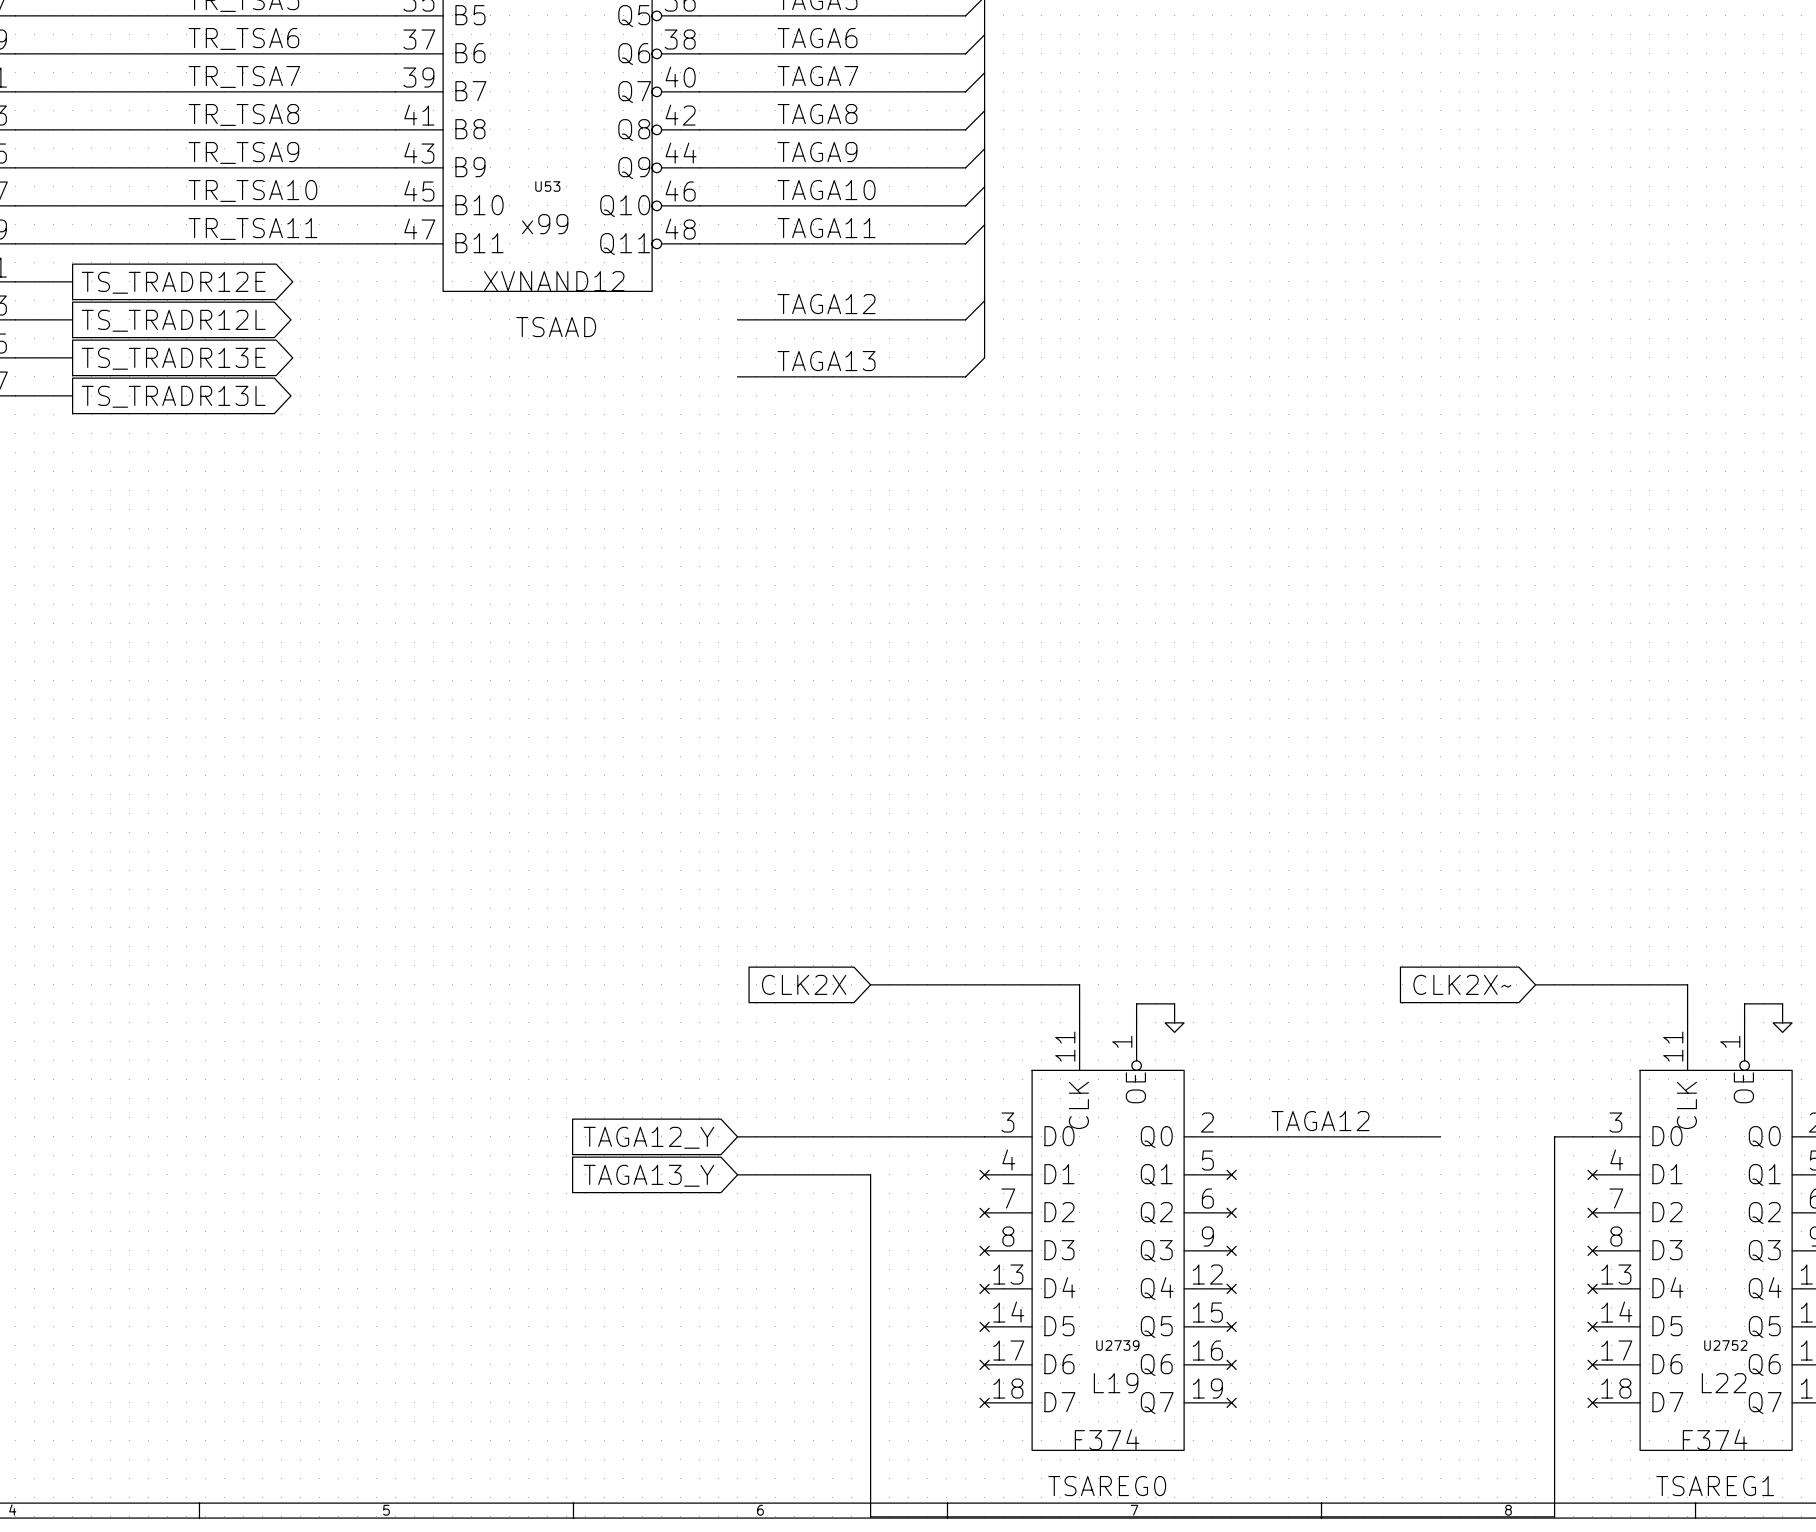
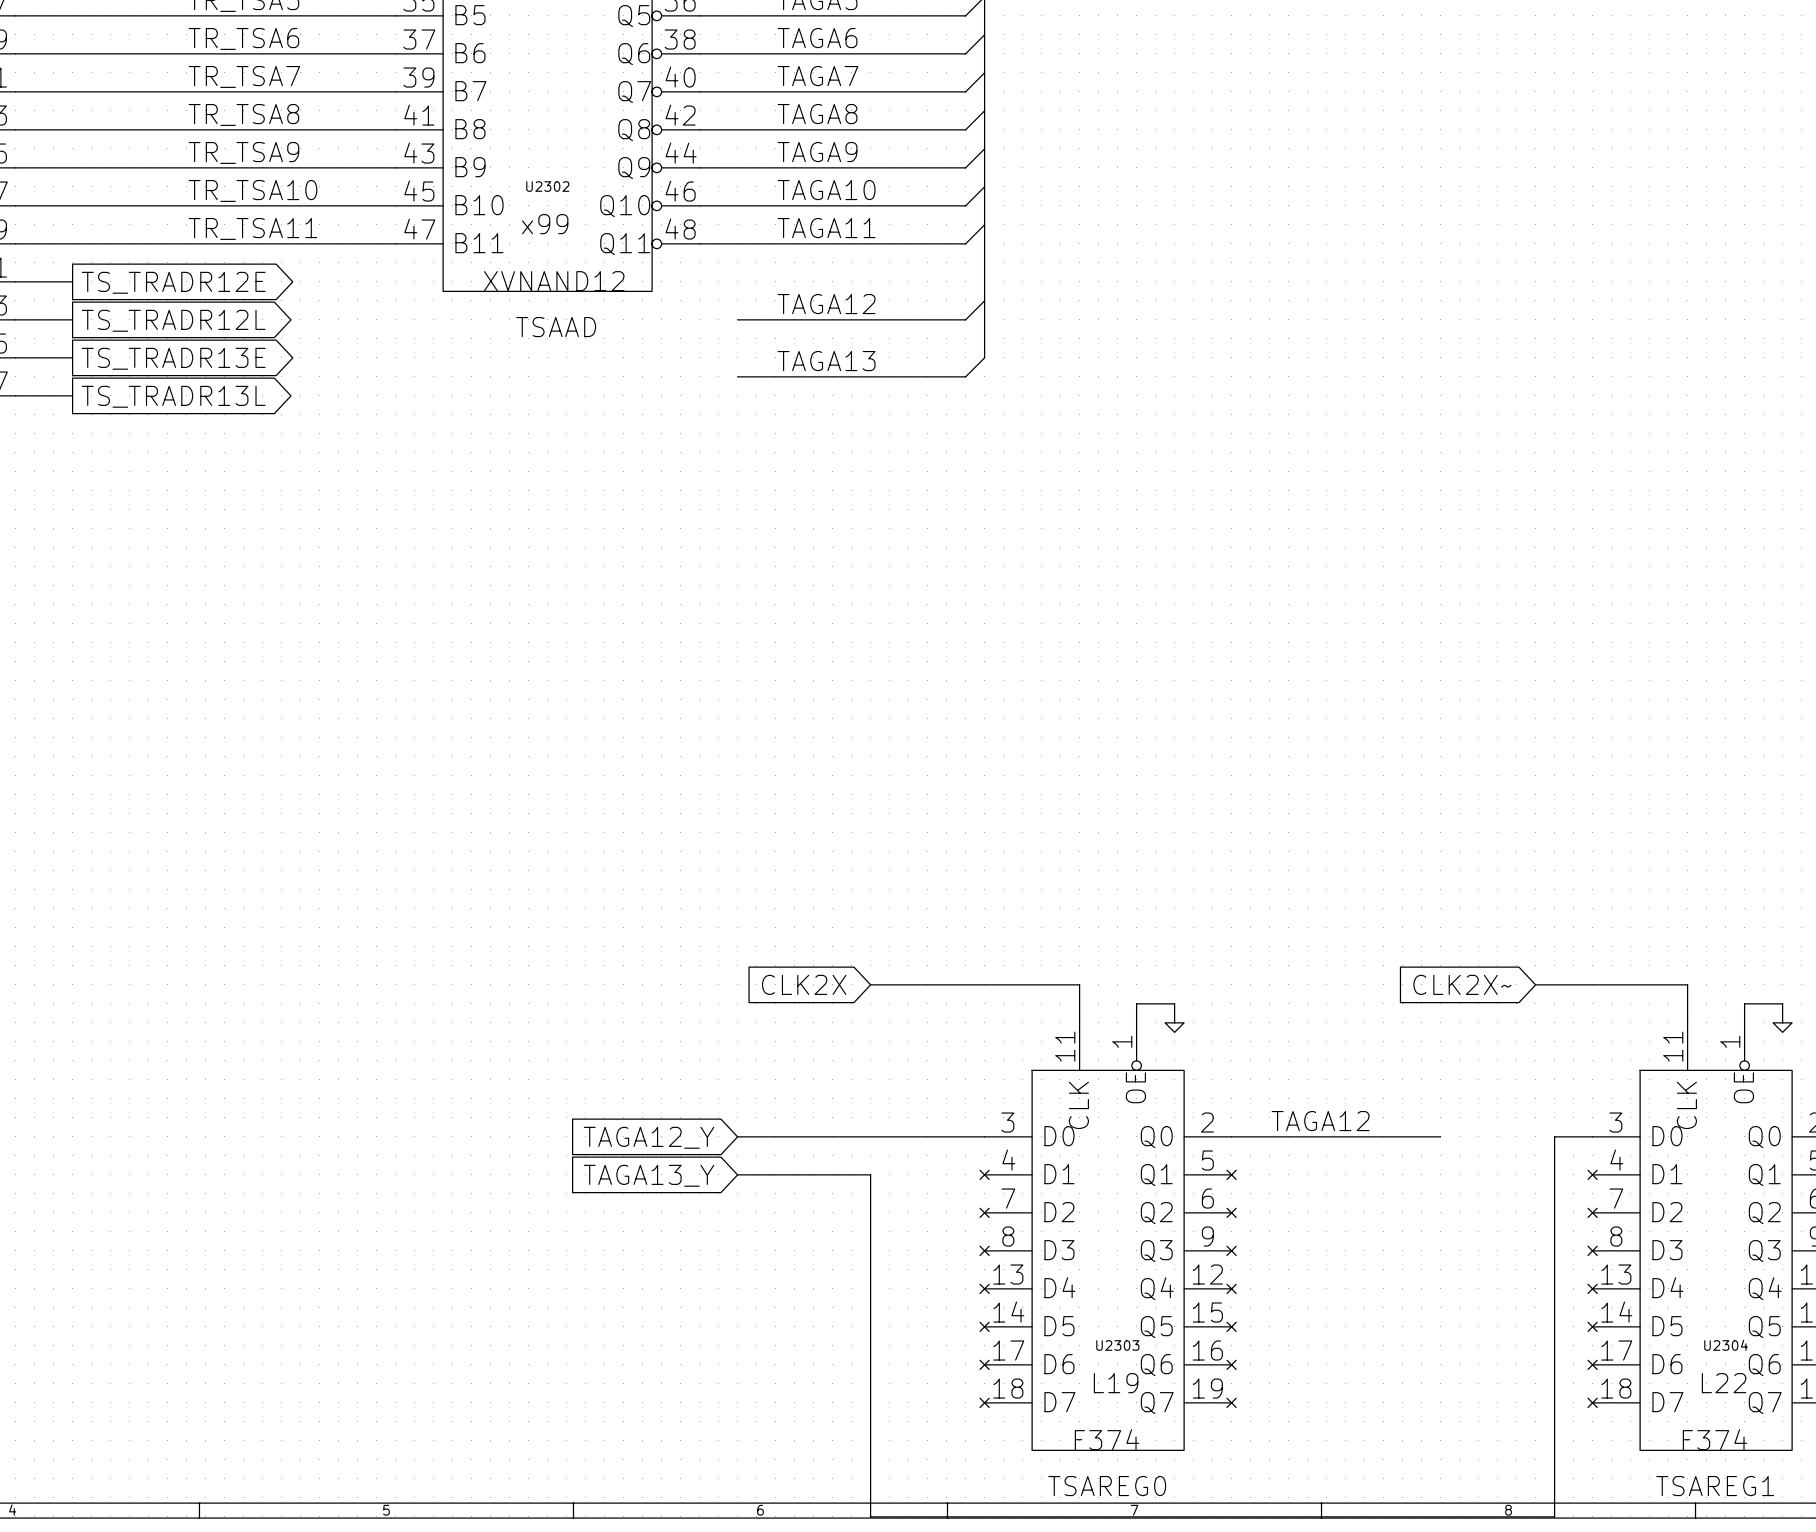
U53 name: U53 (547, 186) -> U2302 (547, 186)
U2739 name: U2739 (1117, 1345) -> U2303 (1117, 1345)
U2752 name: U2752 (1725, 1345) -> U2304 (1726, 1345)

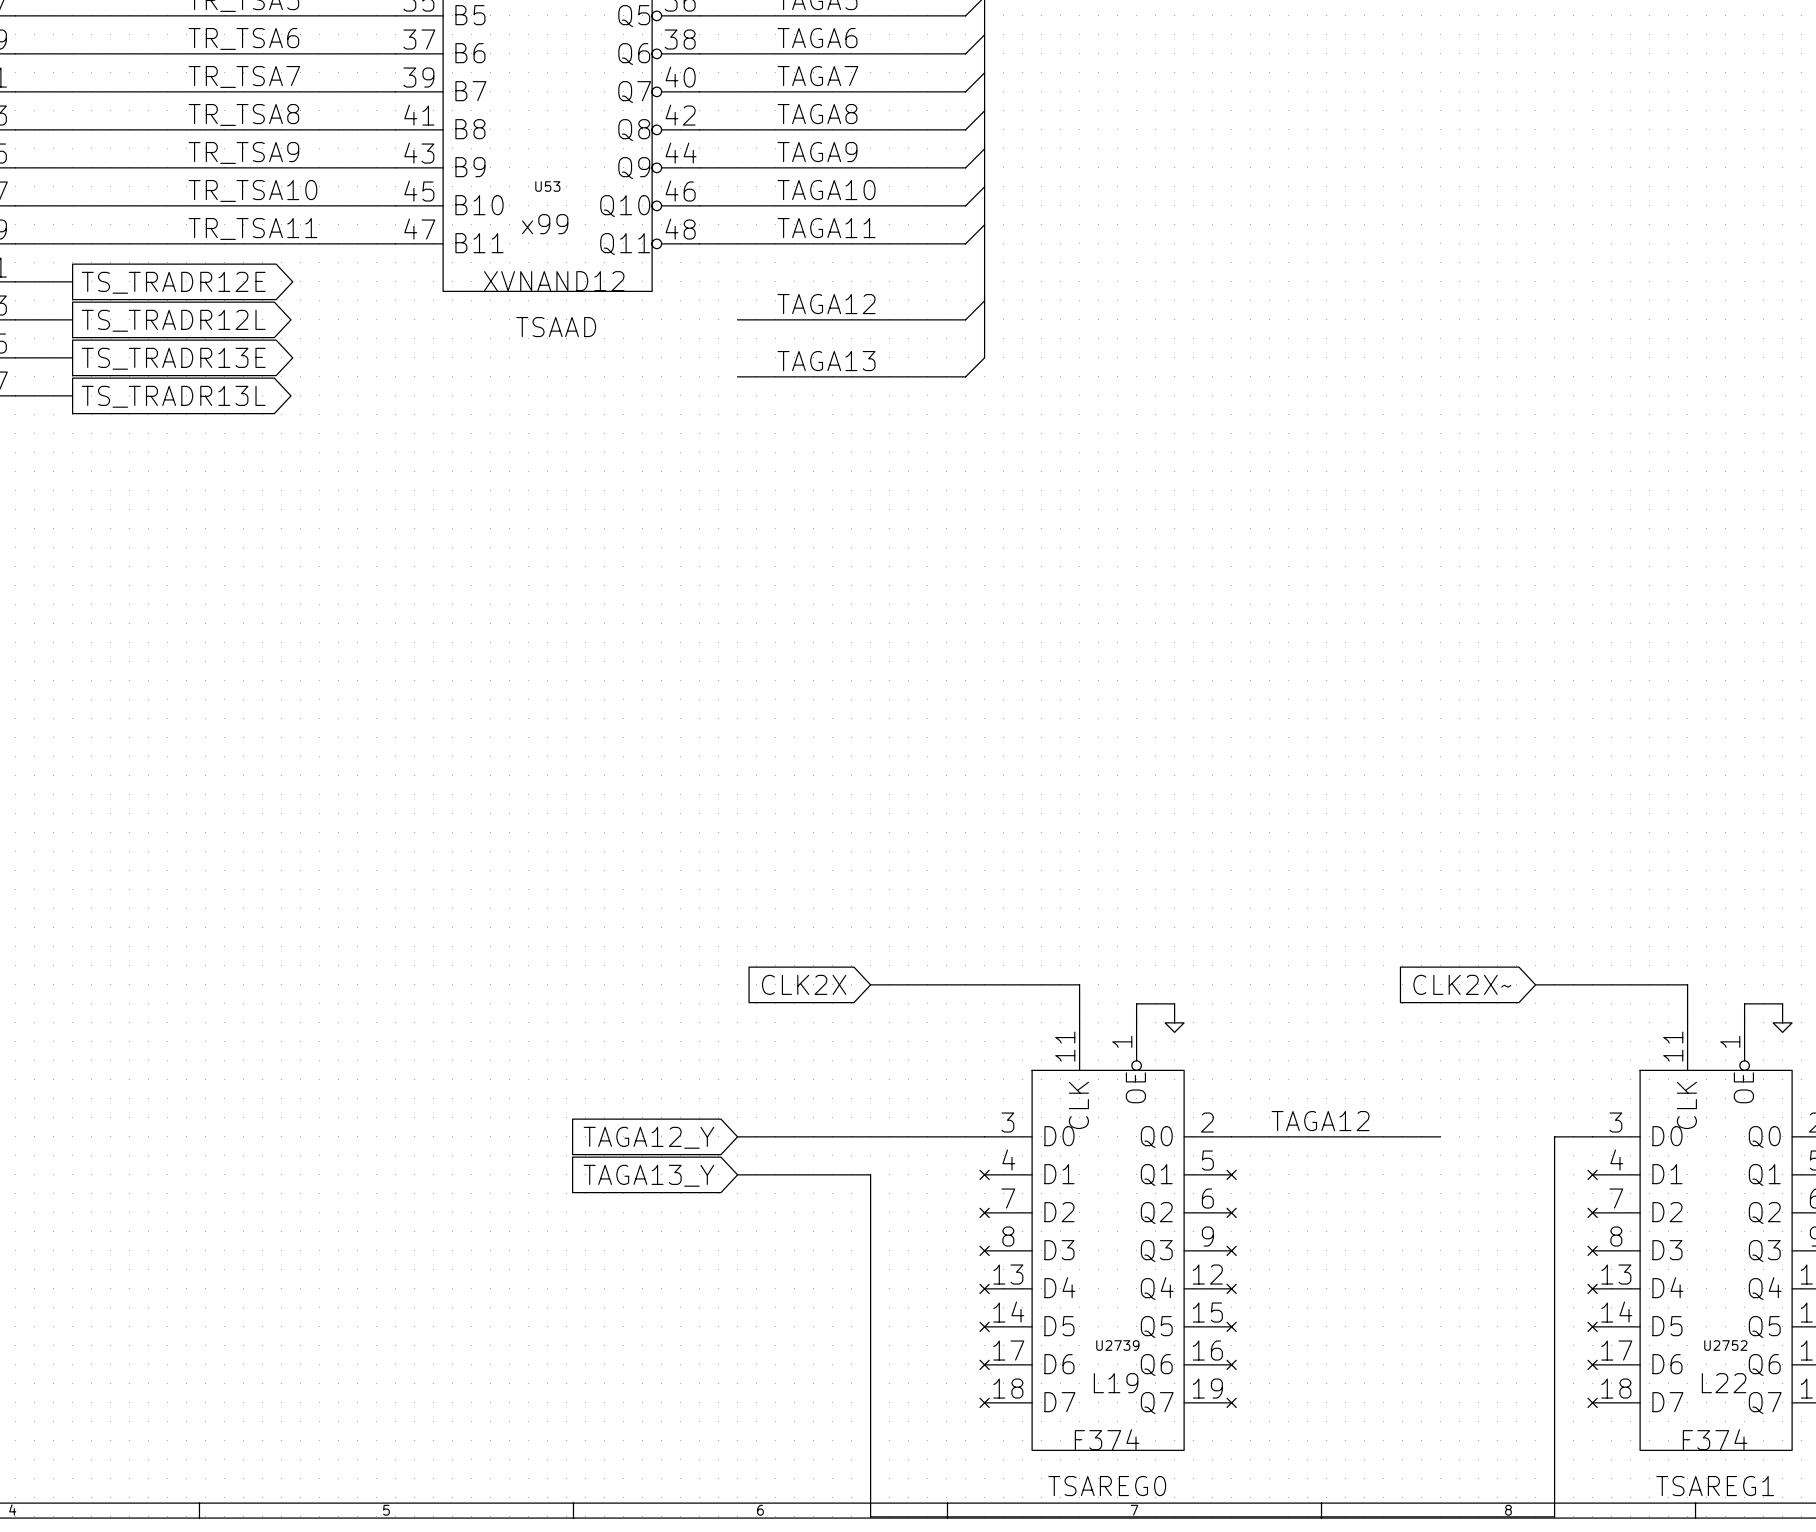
U2302 name: U2302 (547, 186) -> U53 (547, 186)
U2303 name: U2303 (1117, 1345) -> U2739 (1117, 1345)
U2304 name: U2304 (1726, 1345) -> U2752 (1725, 1345)

